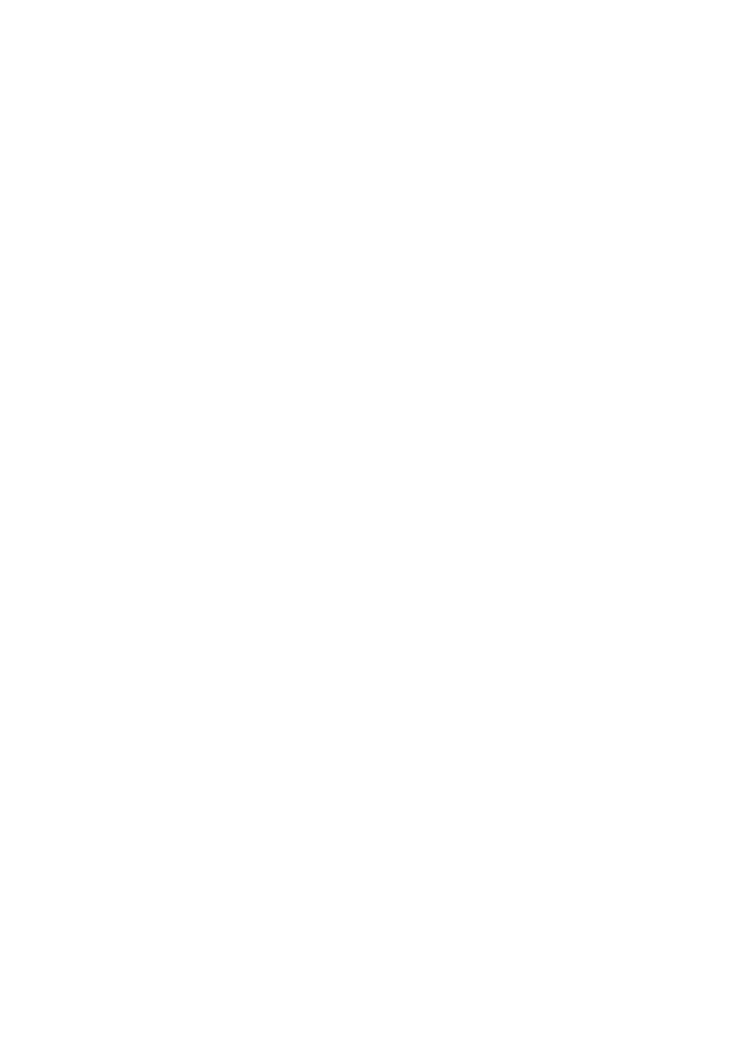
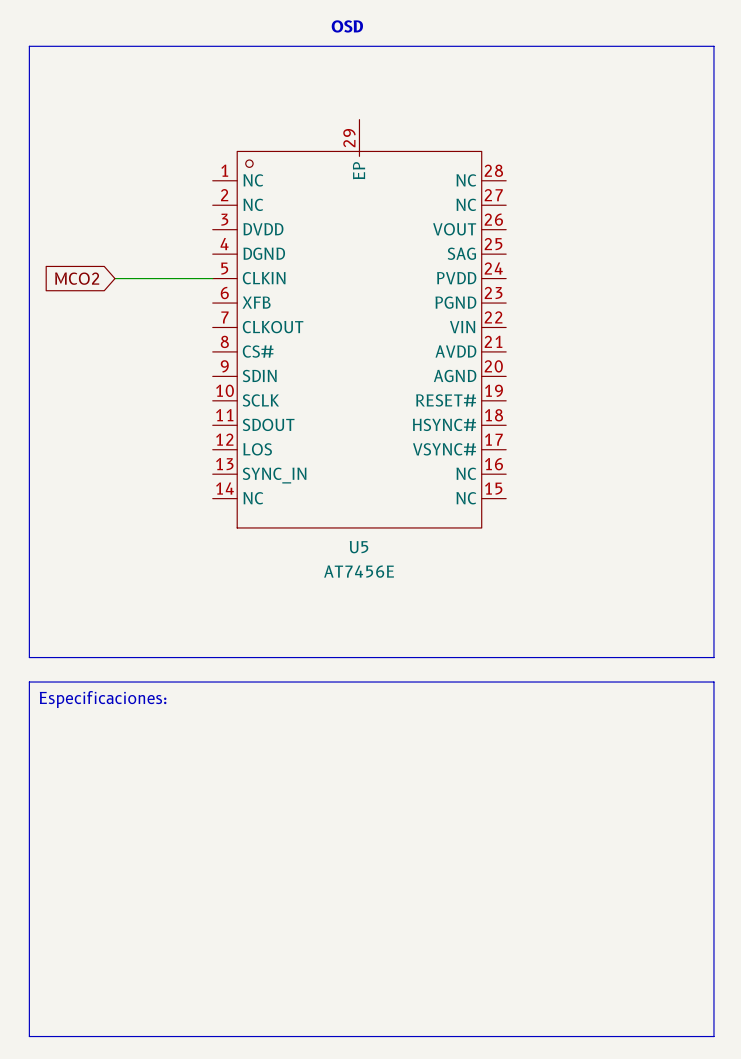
text: none -> OSD (347, 26)
line: none -> (29, 46) (713, 46) (713, 657) (29, 657) (29, 46)
global label: none -> MCO2 (77, 278)
wire: none -> (114, 278) (212, 278)
U5: none -> AT7456E (359, 323)
line: none -> (29, 682) (29, 1036) (713, 1036) (713, 682) (29, 682)
text: none -> Especificaciones: (103, 699)

